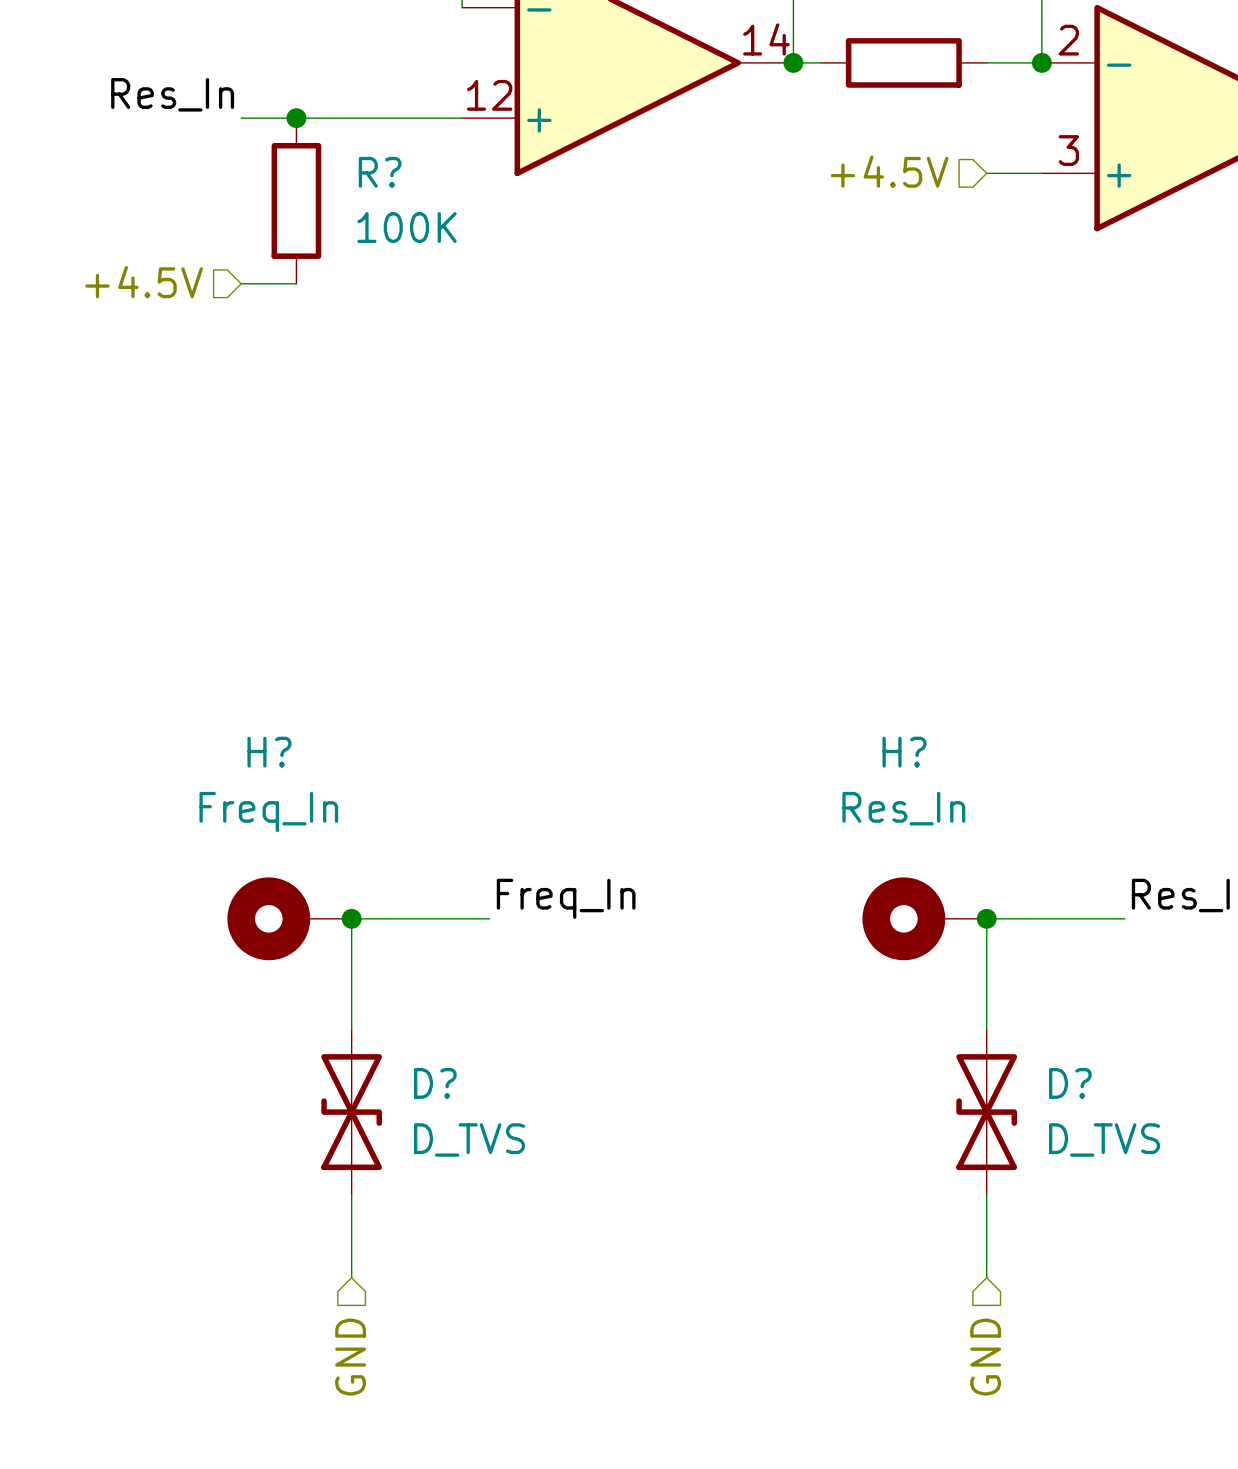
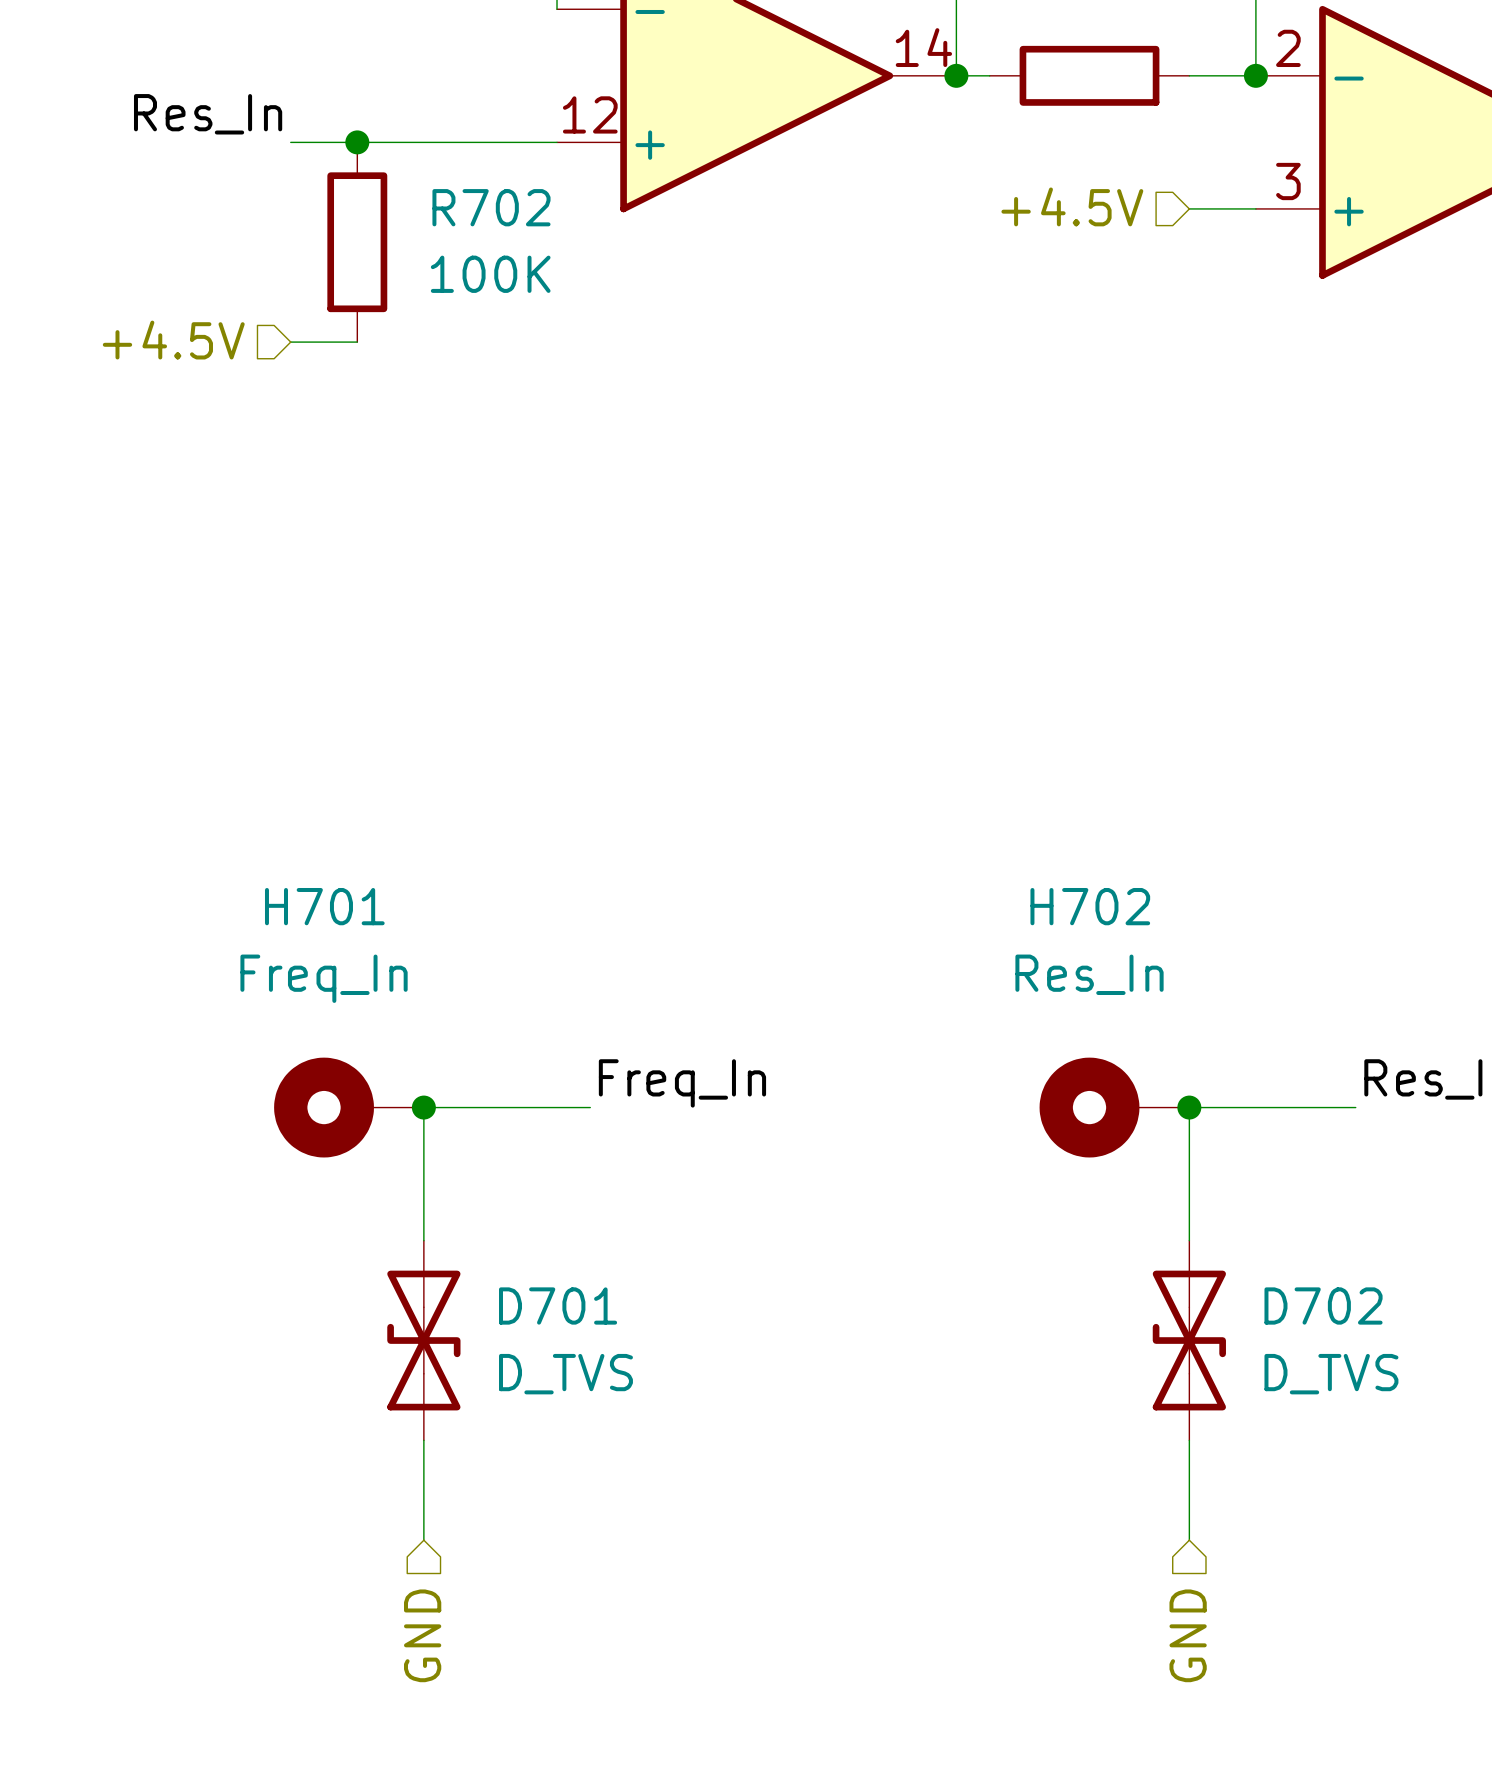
R? name: R? (380, 172) -> R702 (491, 207)
H? name: H? (269, 752) -> H701 (324, 906)
H? name: H? (904, 752) -> H702 (1090, 906)
D? name: D? (435, 1083) -> D701 (558, 1306)
D? name: D? (1070, 1083) -> D702 (1323, 1306)

